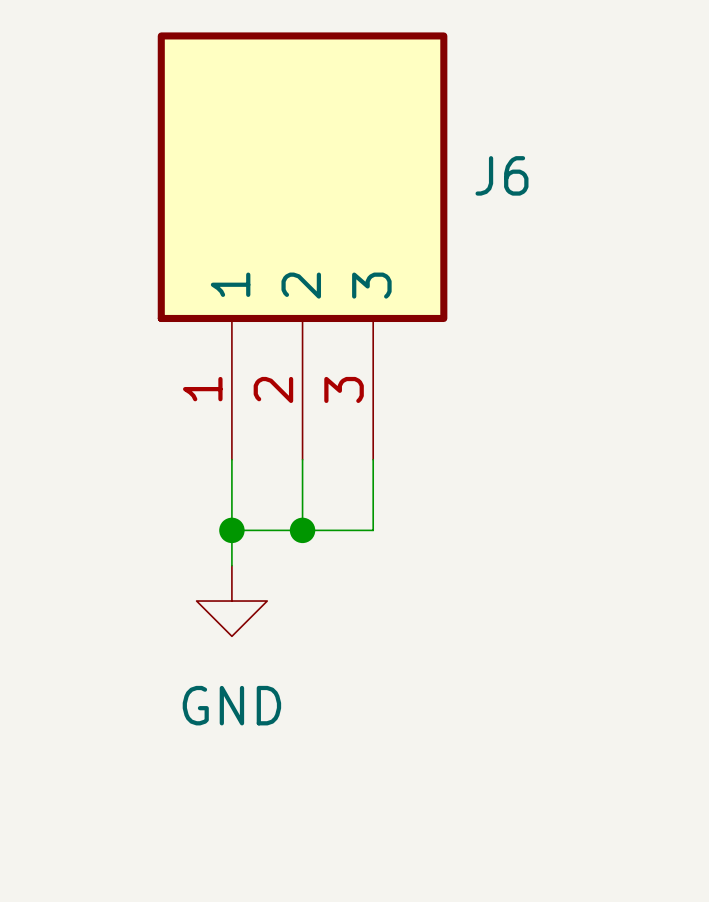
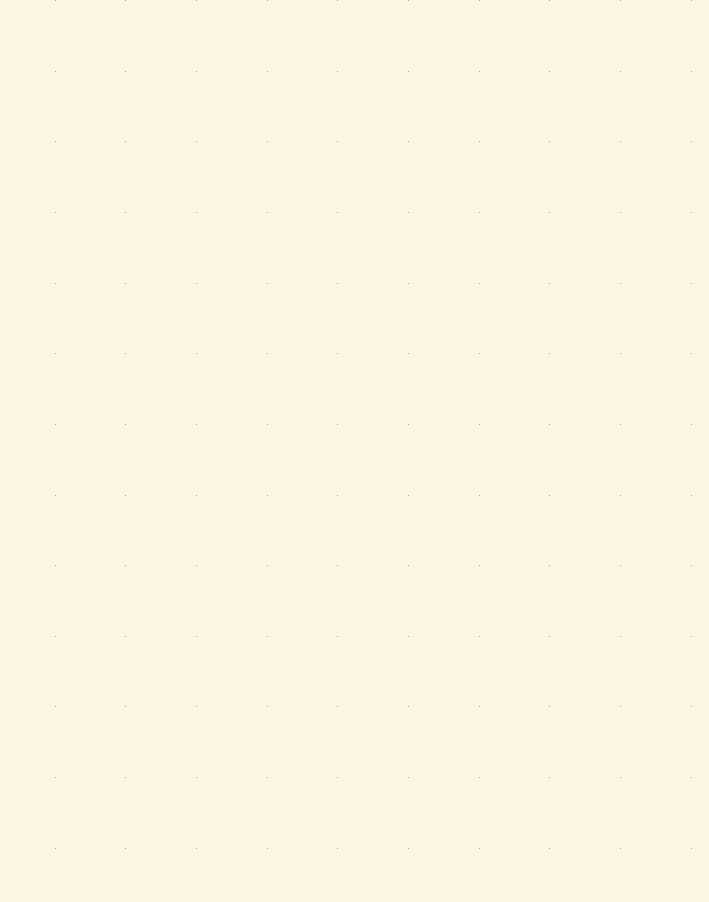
J6: (302, 246) -> none
wire: (231, 459) (231, 565) -> none
wire: (302, 459) (302, 530) -> none
wire: (373, 459) (373, 530) (231, 530) -> none
junction: (231, 530) -> none
junction: (302, 530) -> none
power symbol: GND (231, 601) -> none

